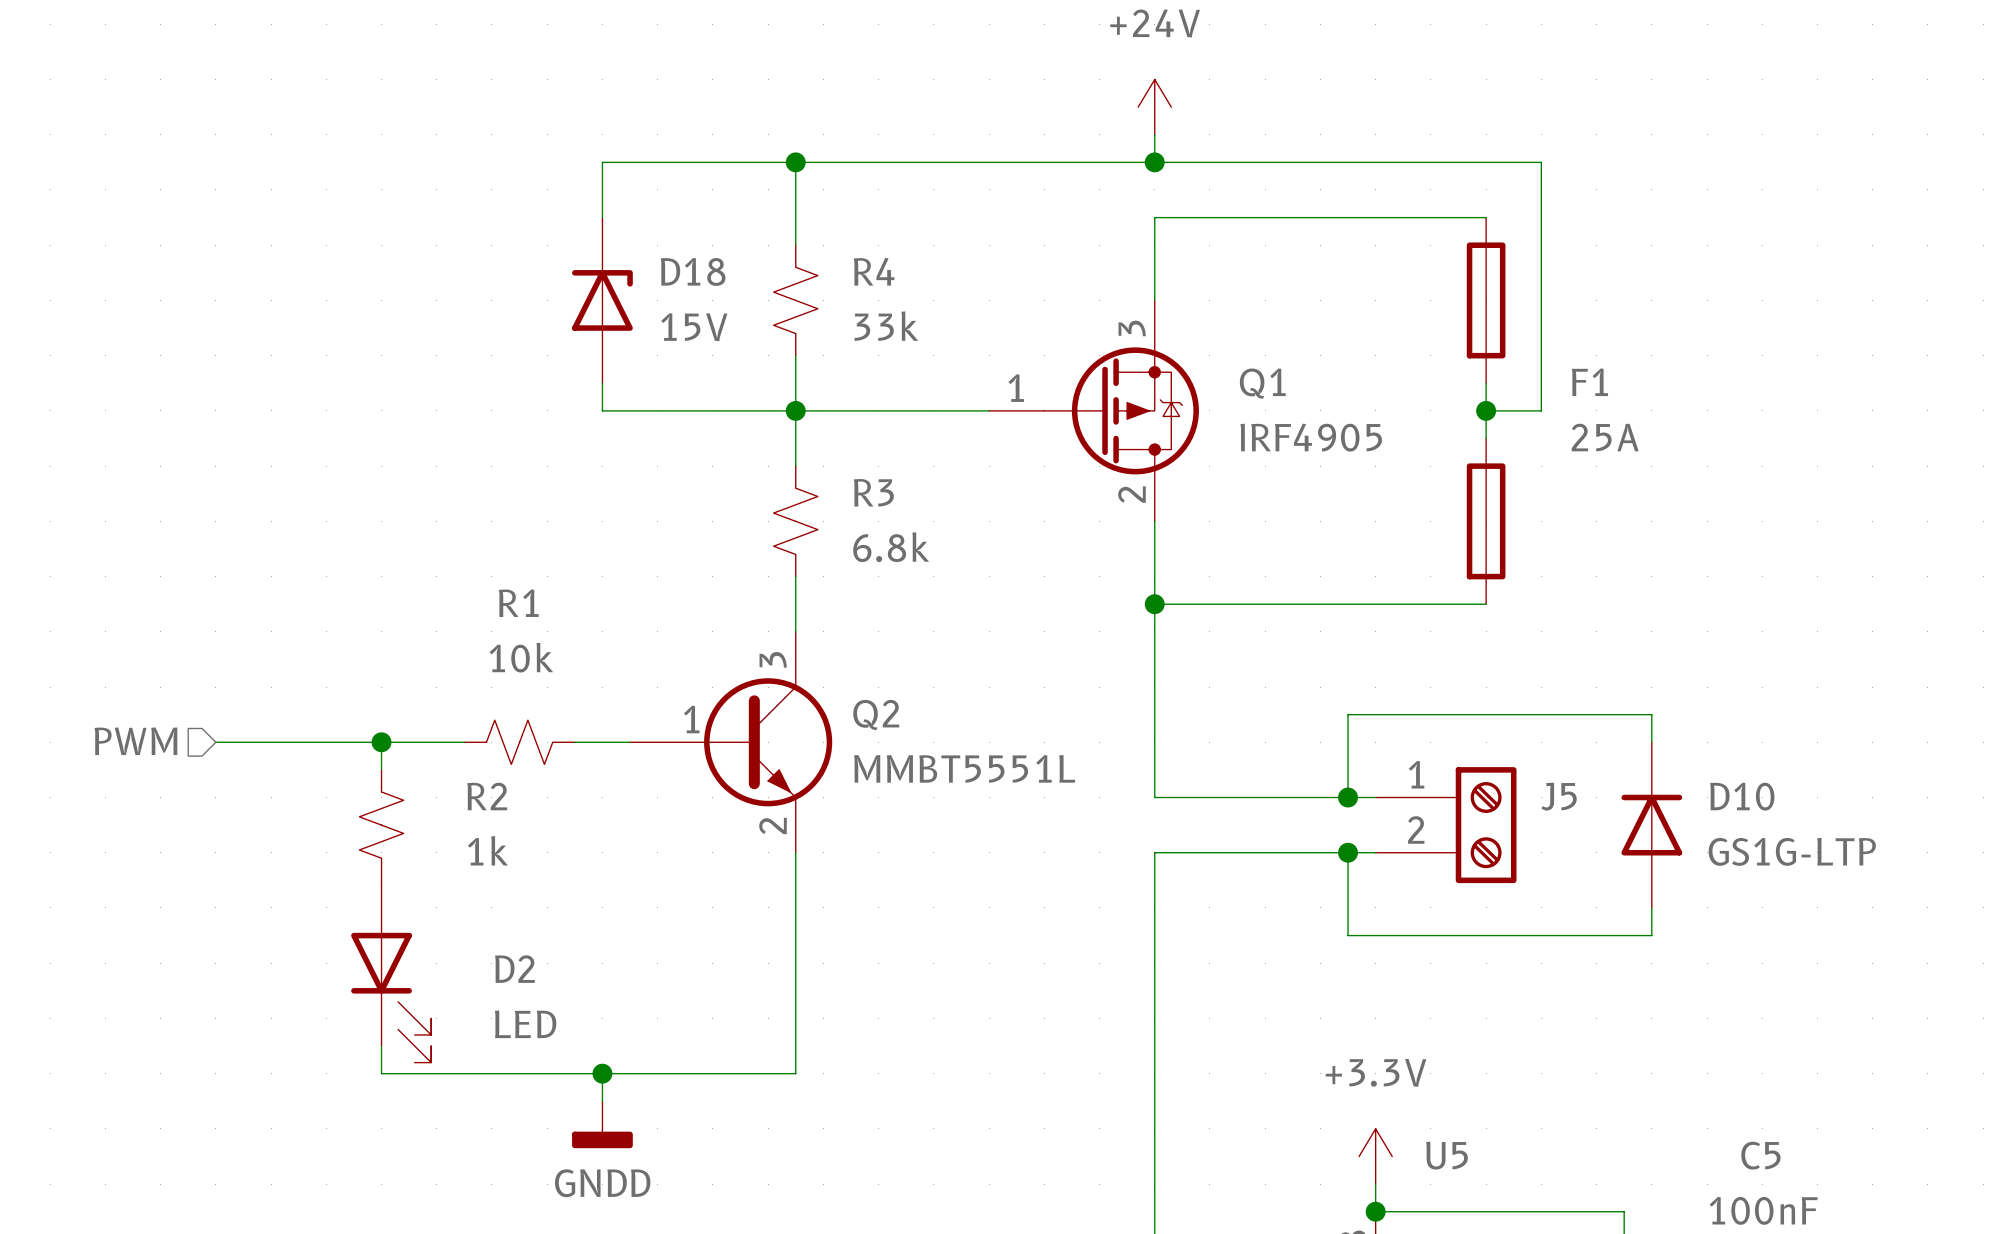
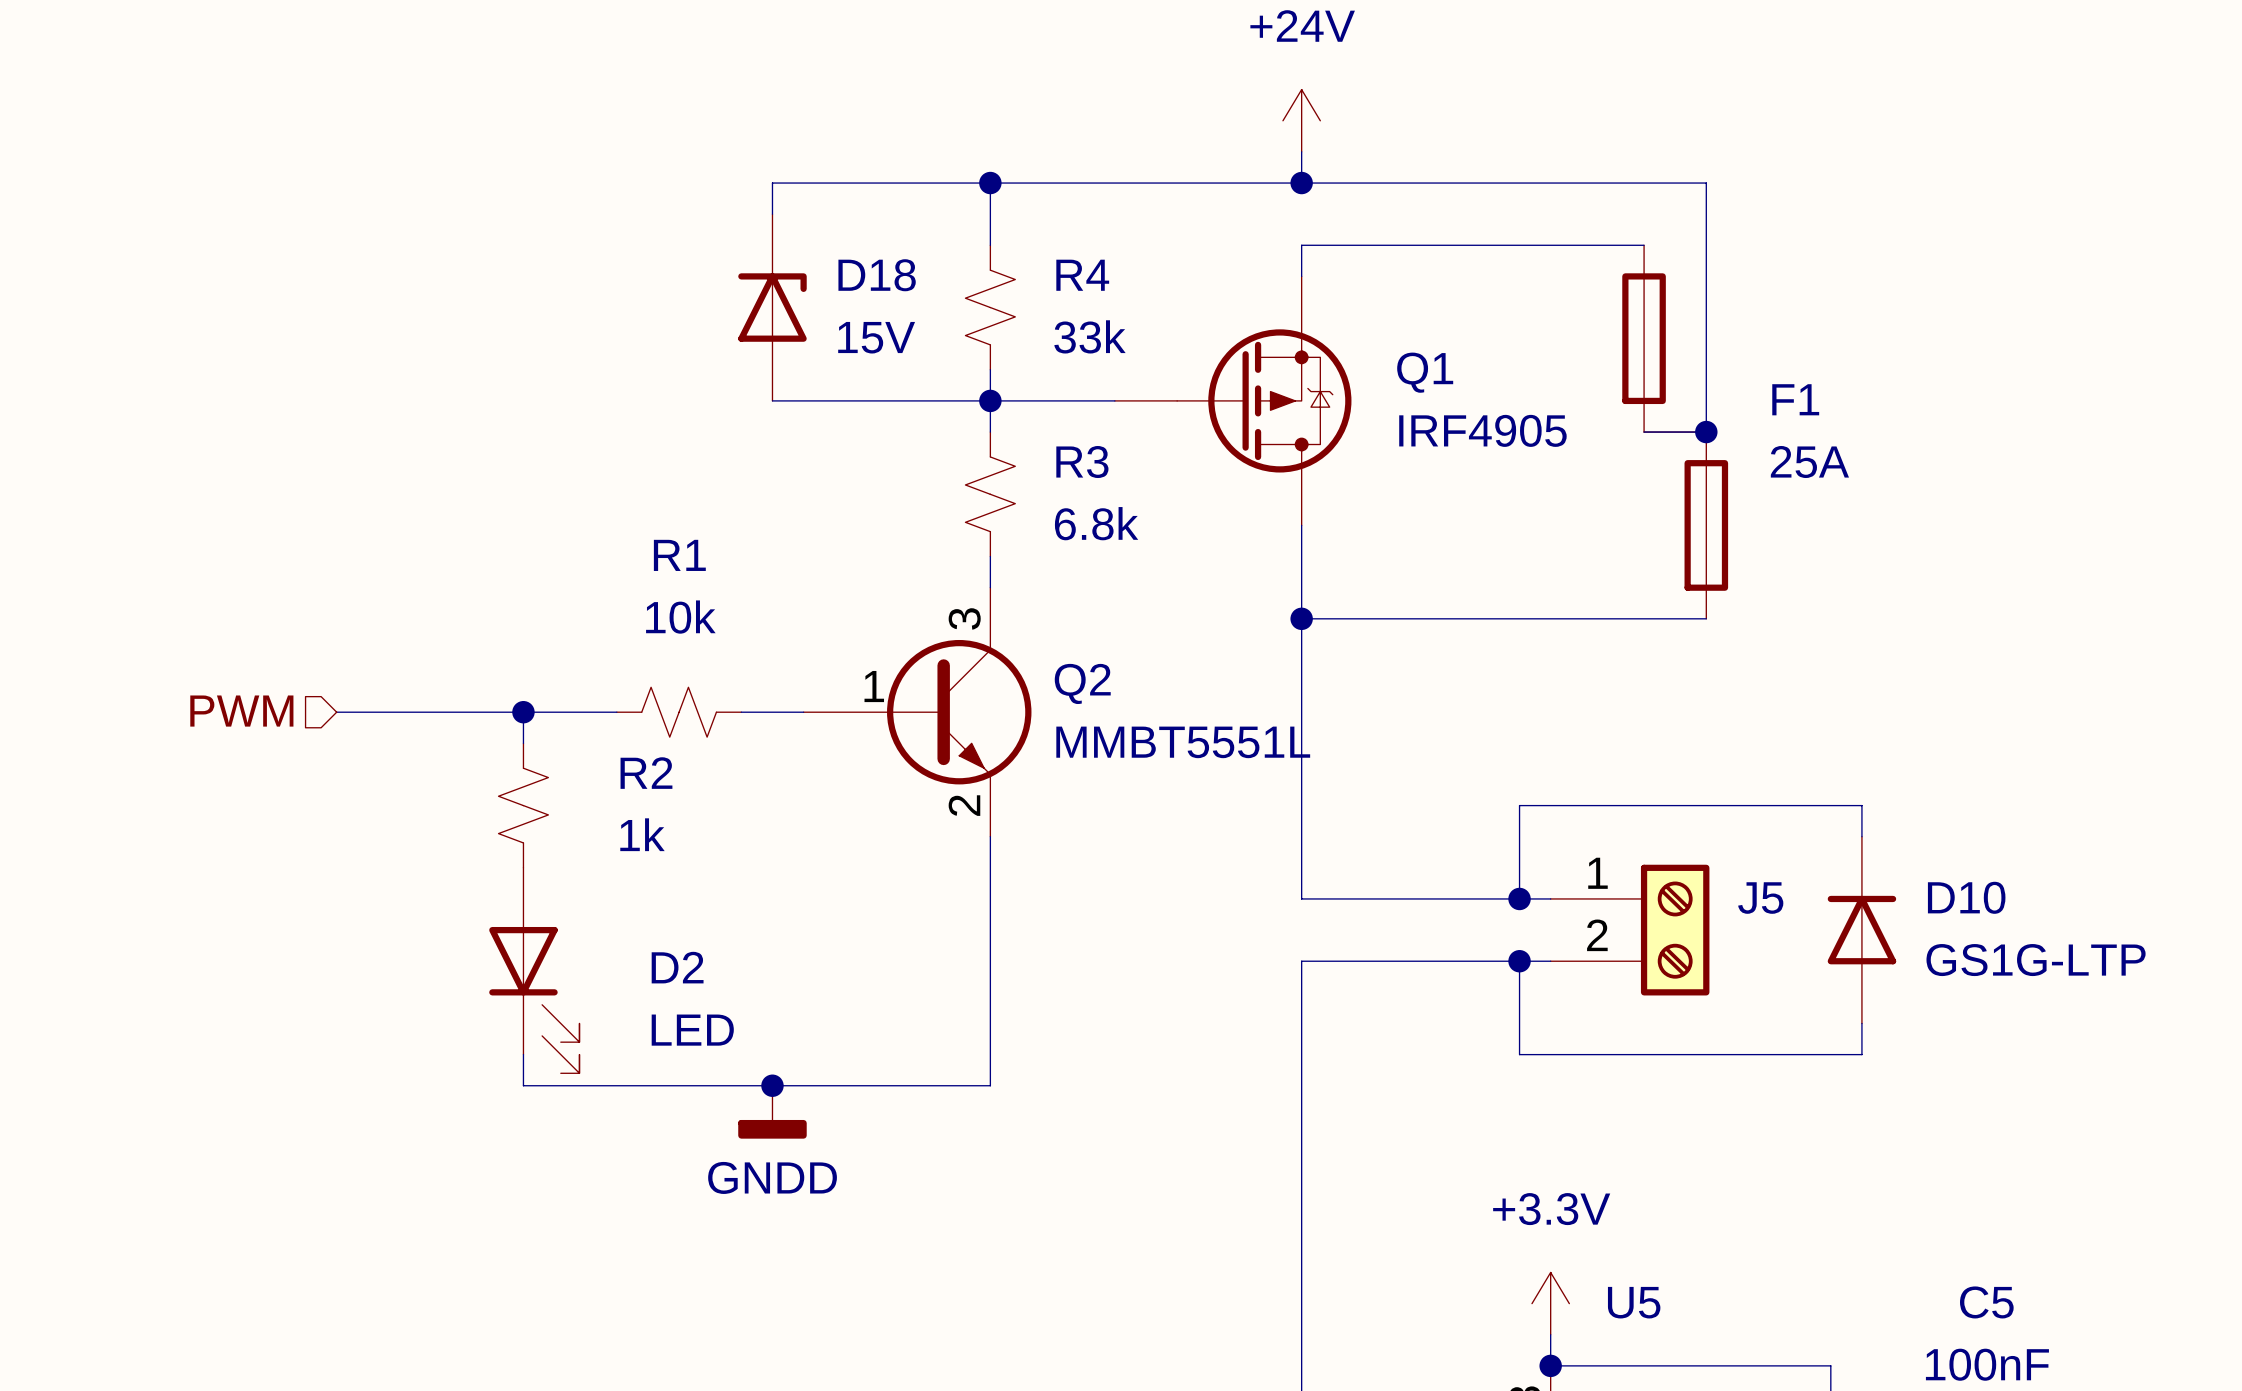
wire: (685, 162) (602, 162) (602, 217) -> (772, 183) (772, 214)
wire: (795, 162) (795, 245) -> none
junction position: (795, 162) -> (990, 183)
wire: none -> (990, 183) (990, 245)
wire: (1513, 162) (1541, 162) (1541, 410) (1486, 410) -> (1706, 183) (1706, 432) (1644, 432)
wire: (1458, 217) (1486, 217) -> none
F1 symbol: [1466, 217, 1506, 605] -> [1622, 245, 1729, 619]
D18 position: (602, 300) -> (772, 307)
R4 position: (795, 300) -> (990, 307)
Q1 pin number: 3 (1132, 328) -> none
wire: none -> (772, 400) (1114, 400)
wire: (795, 355) (795, 466) -> none
wire: (602, 383) (602, 410) (989, 410) -> none
wire: (1486, 383) (1486, 438) -> none
Q1 pin number: 1 (1016, 388) -> none
junction position: (795, 410) -> (990, 400)
Q1 position: (1093, 410) -> (1233, 400)
junction position: (1486, 410) -> (1706, 432)
wire: none -> (990, 556) (990, 587)
Q1 pin number: 2 (1131, 494) -> none
R3 position: (795, 521) -> (990, 494)
wire: none -> (1301, 618) (1706, 618)
wire: (795, 576) (795, 631) -> (990, 369) (990, 432)
wire: (1154, 604) (1486, 604) -> none
junction position: (1154, 604) -> (1301, 618)
junction: none -> (523, 712)
hierarchical label position: PWM (135, 741) -> PWM (241, 711)
wire: (215, 742) (464, 742) -> (336, 712) (616, 712)
wire: (381, 742) (381, 769) -> (523, 712) (523, 743)
junction: (381, 742) -> none
R1 position: (519, 742) -> (679, 712)
wire: (574, 742) (630, 742) -> (741, 712) (803, 712)
Q2 position: (731, 742) -> (917, 712)
R2 position: (381, 825) -> (523, 805)
wire: (795, 852) (795, 1073) (381, 1073) (381, 1046) -> (990, 836) (990, 1085) (523, 1085) (523, 1054)
junction: none -> (772, 1085)
D2 position: (391, 971) -> (534, 970)
wire: (602, 1073) (602, 1101) -> none
junction: (602, 1073) -> none
power symbol position: GNDD (602, 1124) -> GNDD (772, 1112)

